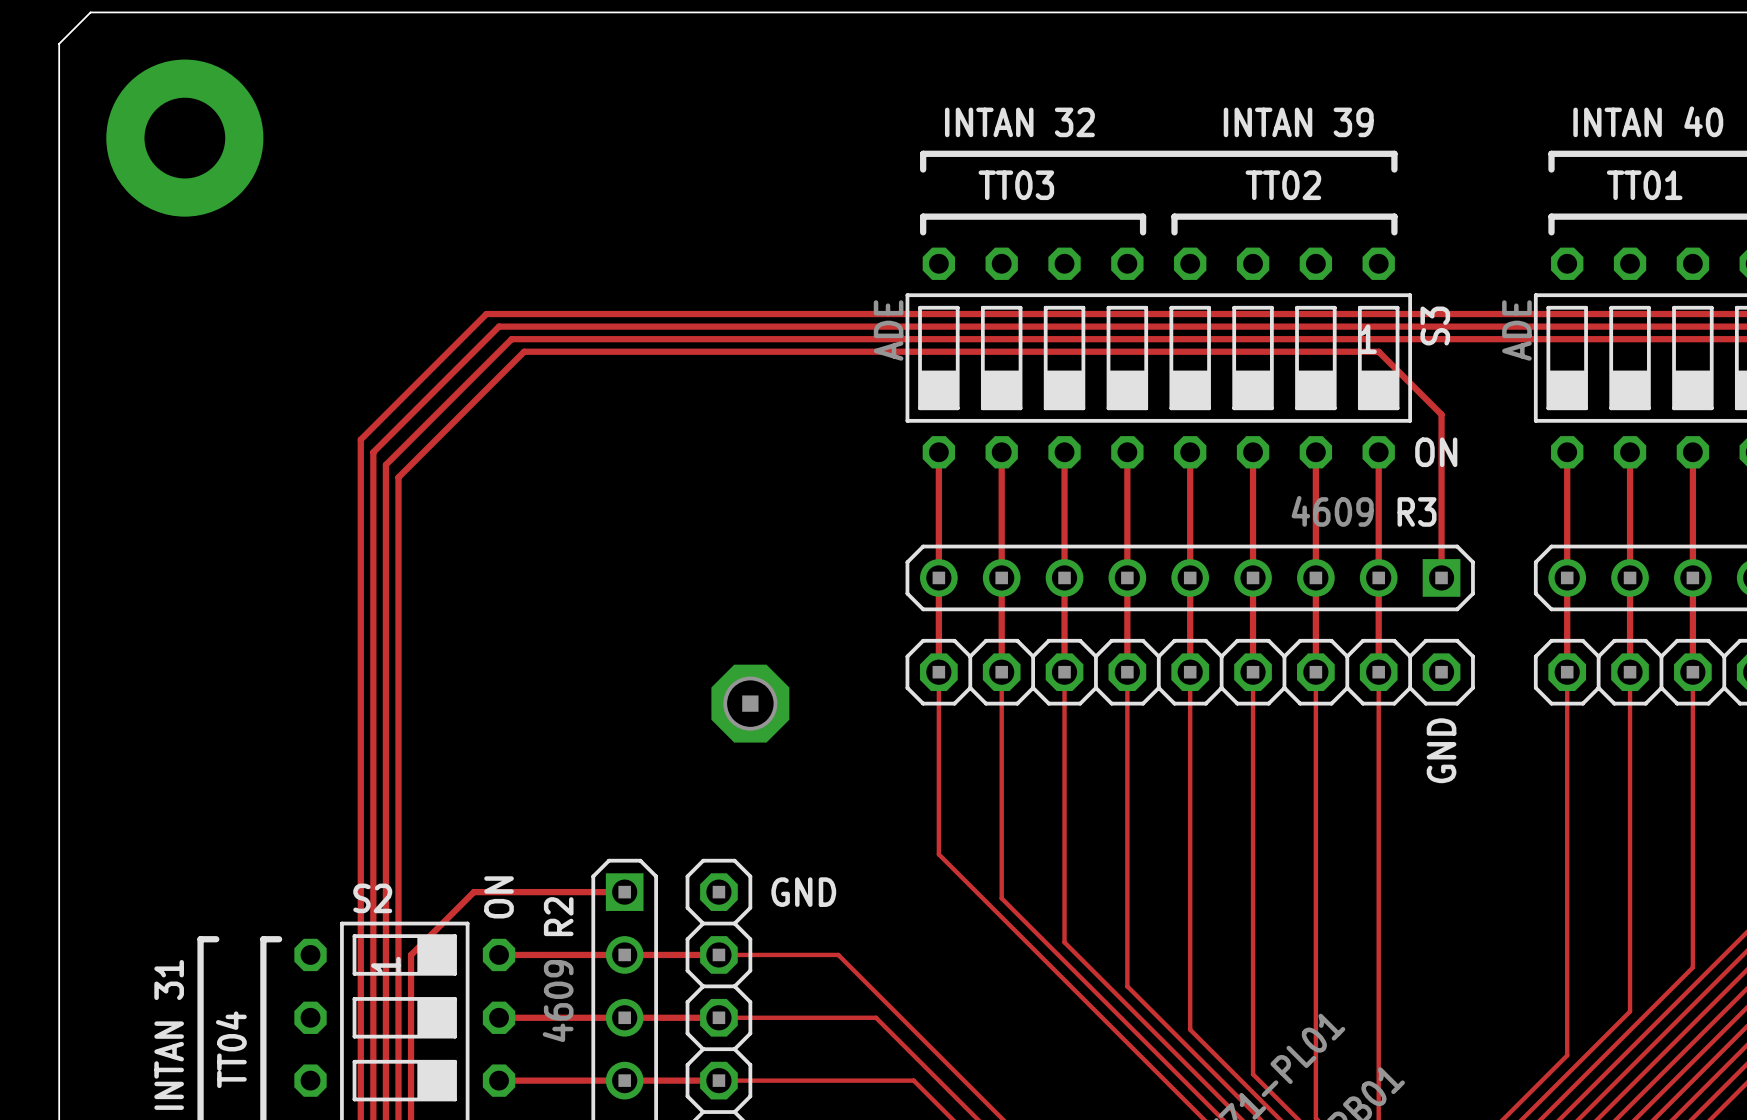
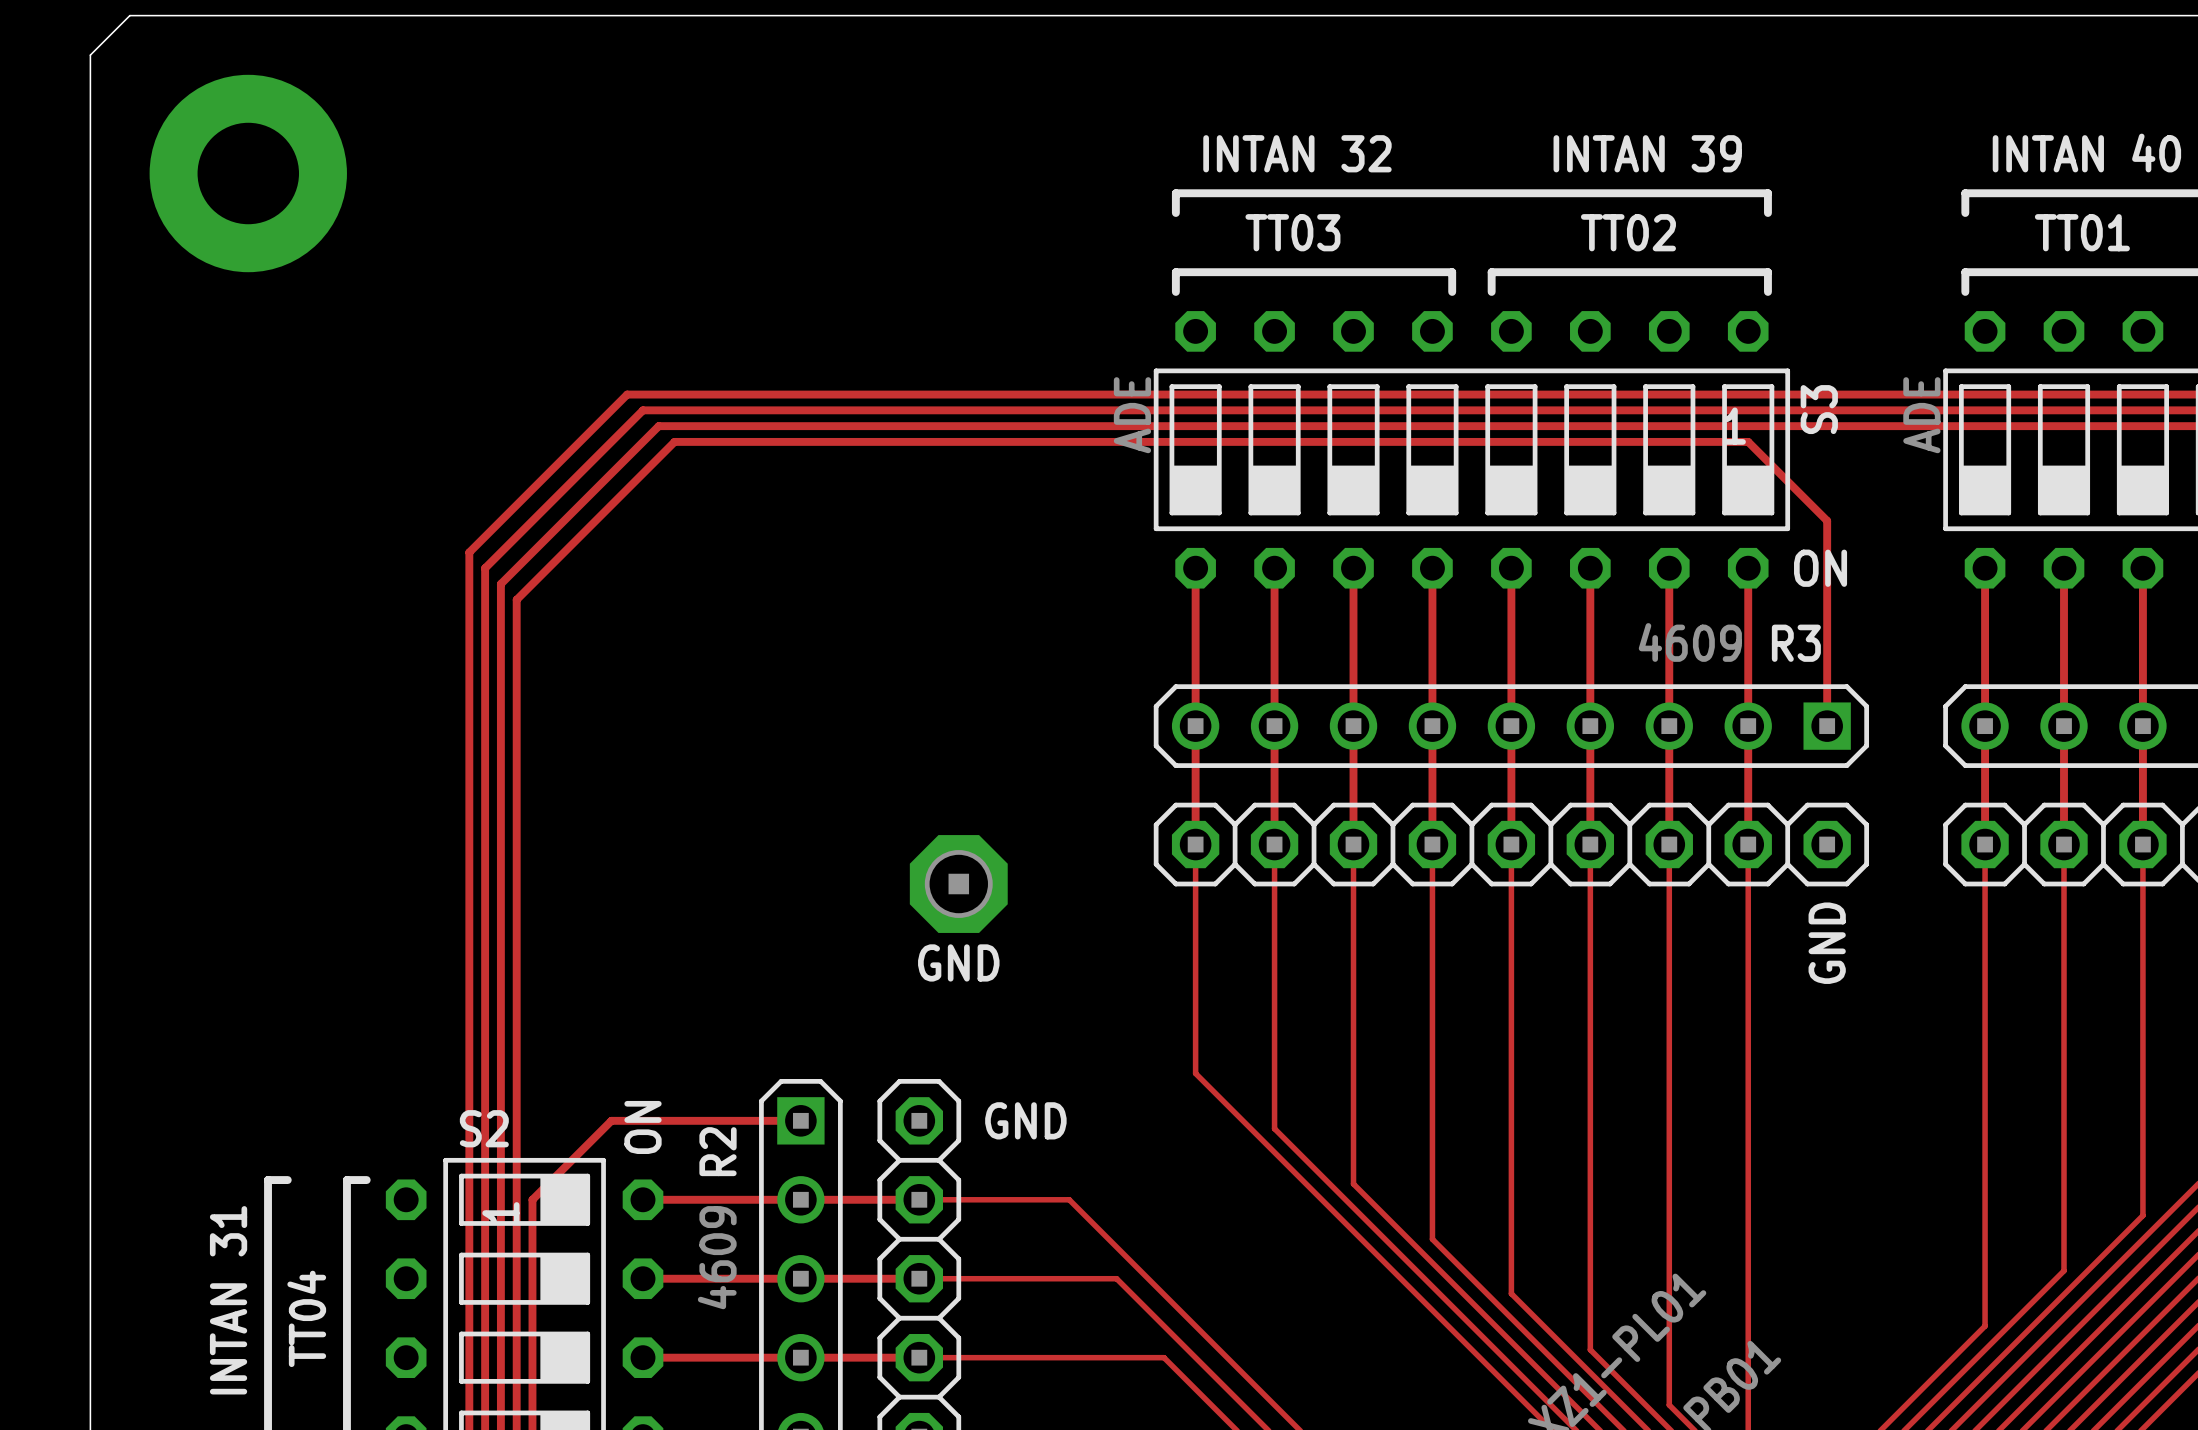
text: none -> GND (958, 962)

